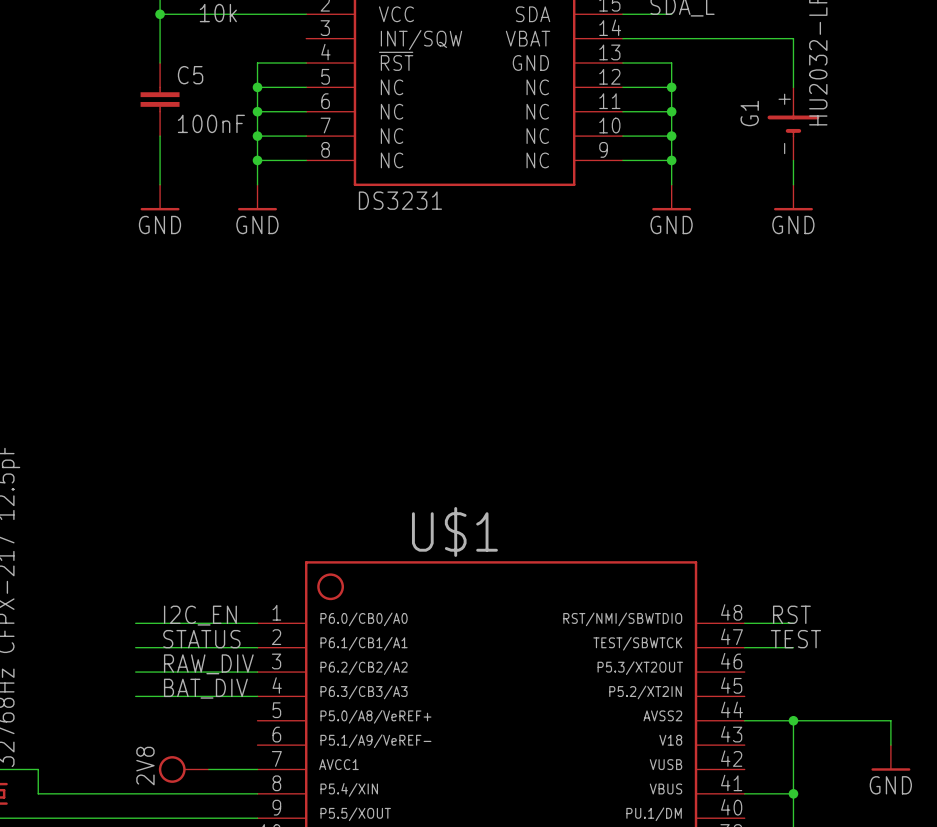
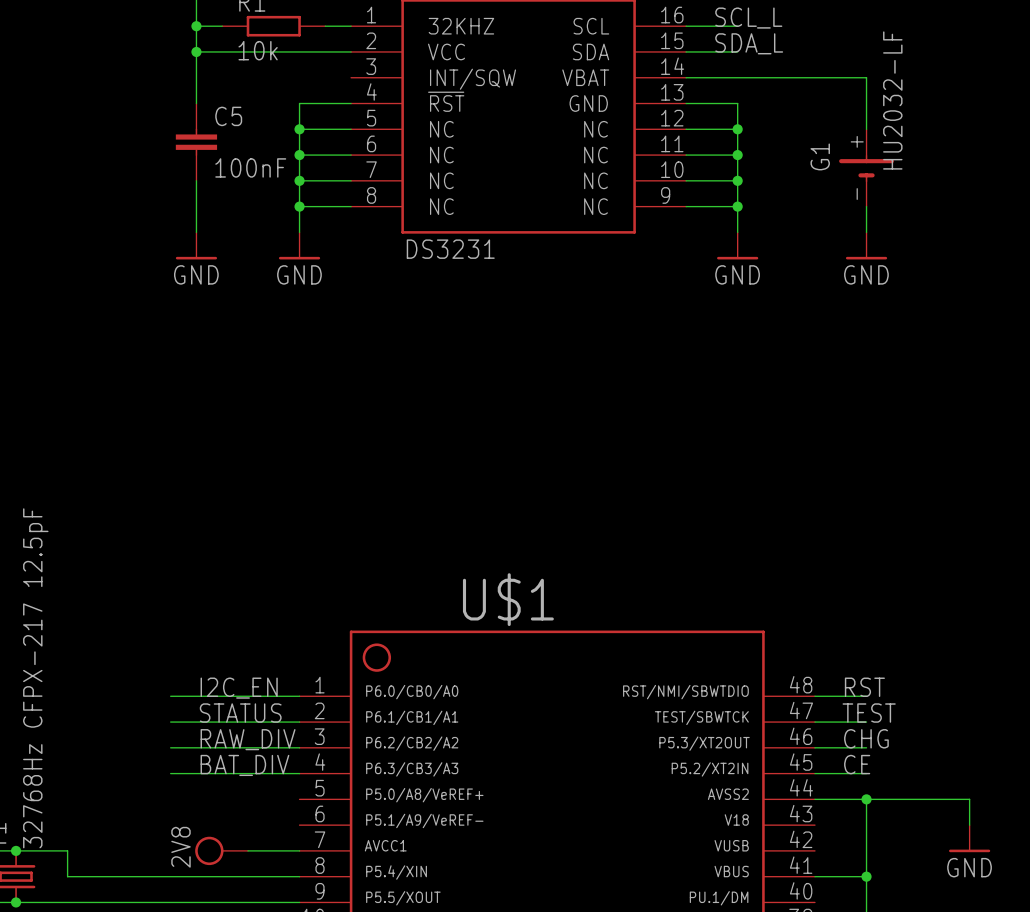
label: none -> CHG (866, 738)
wire: none -> (814, 747) (866, 747)
label: none -> CE (857, 764)
wire: none -> (814, 773) (866, 773)

